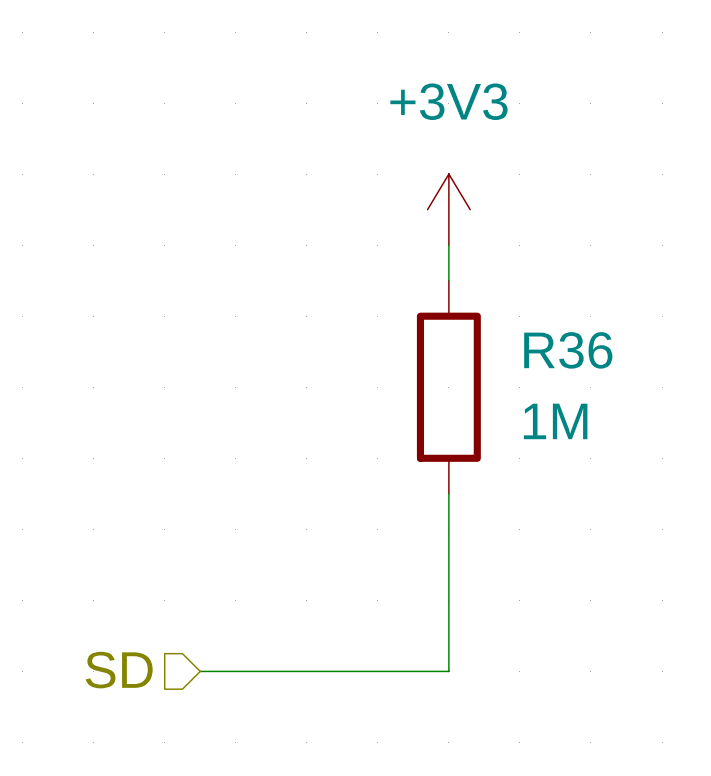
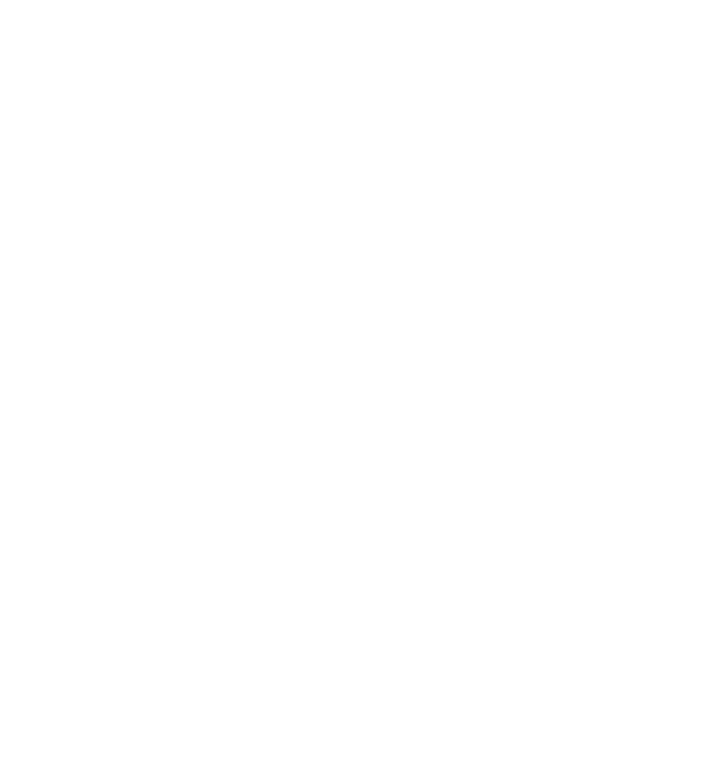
power symbol: +3V3 (448, 209) -> none
wire: (448, 245) (448, 280) -> none
R36: 1M (448, 387) -> none
wire: (448, 493) (448, 671) (200, 671) -> none
hierarchical label: SD (119, 670) -> none

